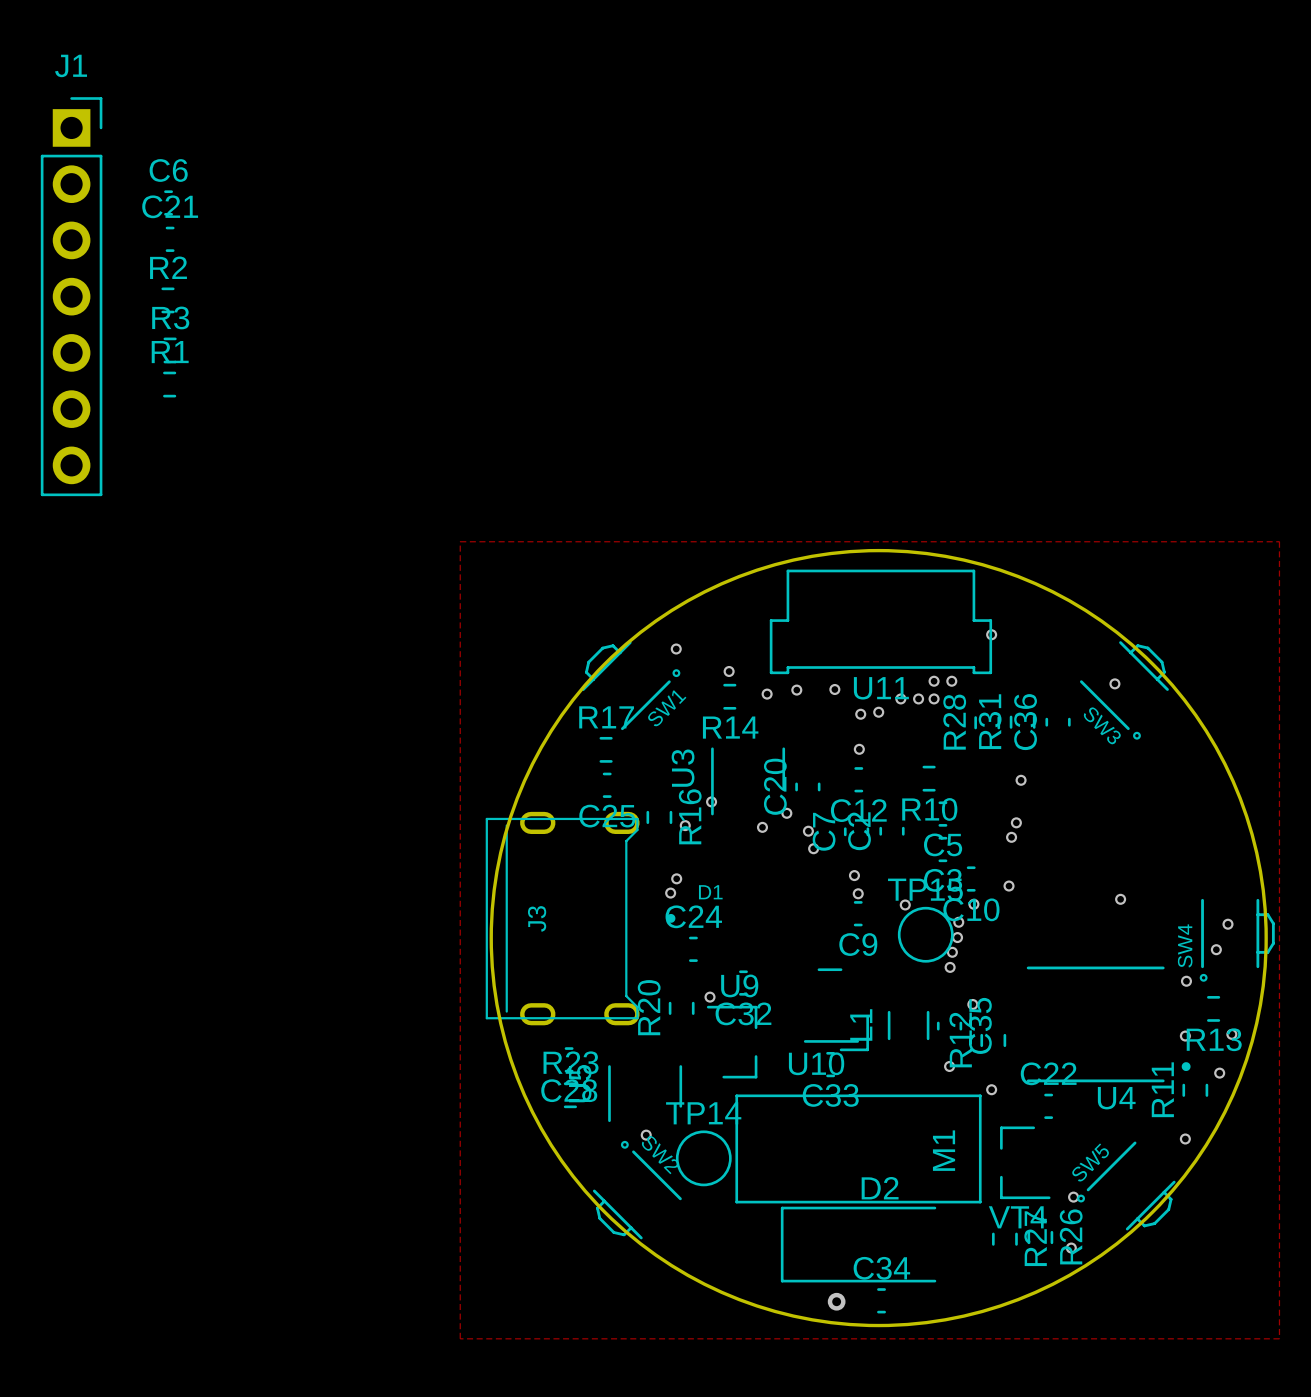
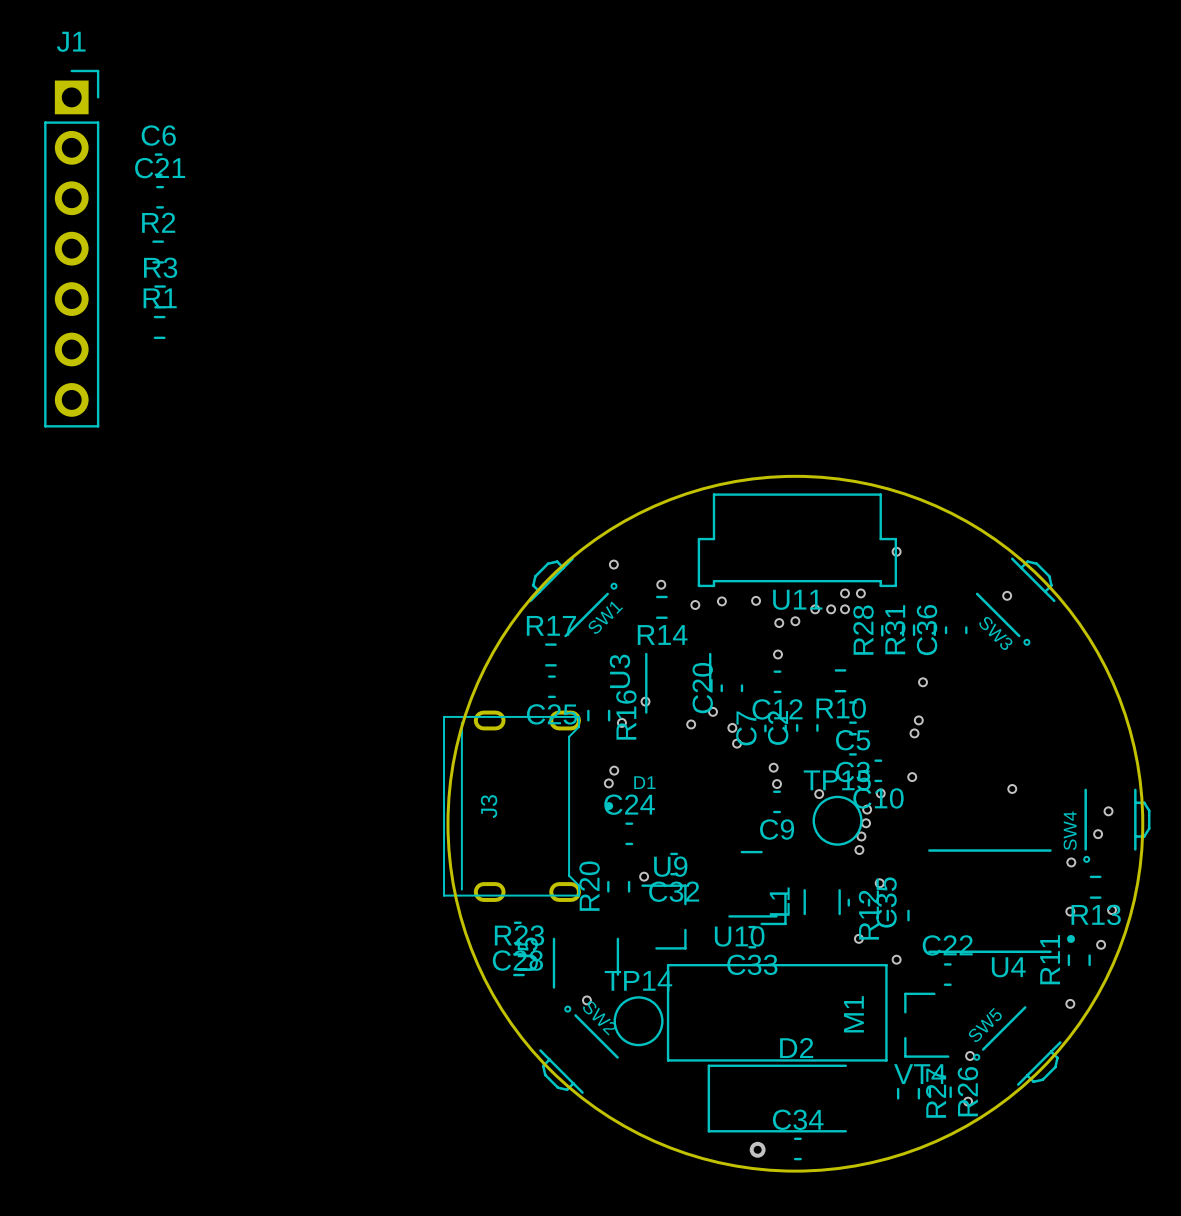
zone outline: (460, 541) (460, 1338) (1279, 1338) (1279, 541) (460, 541) -> none

